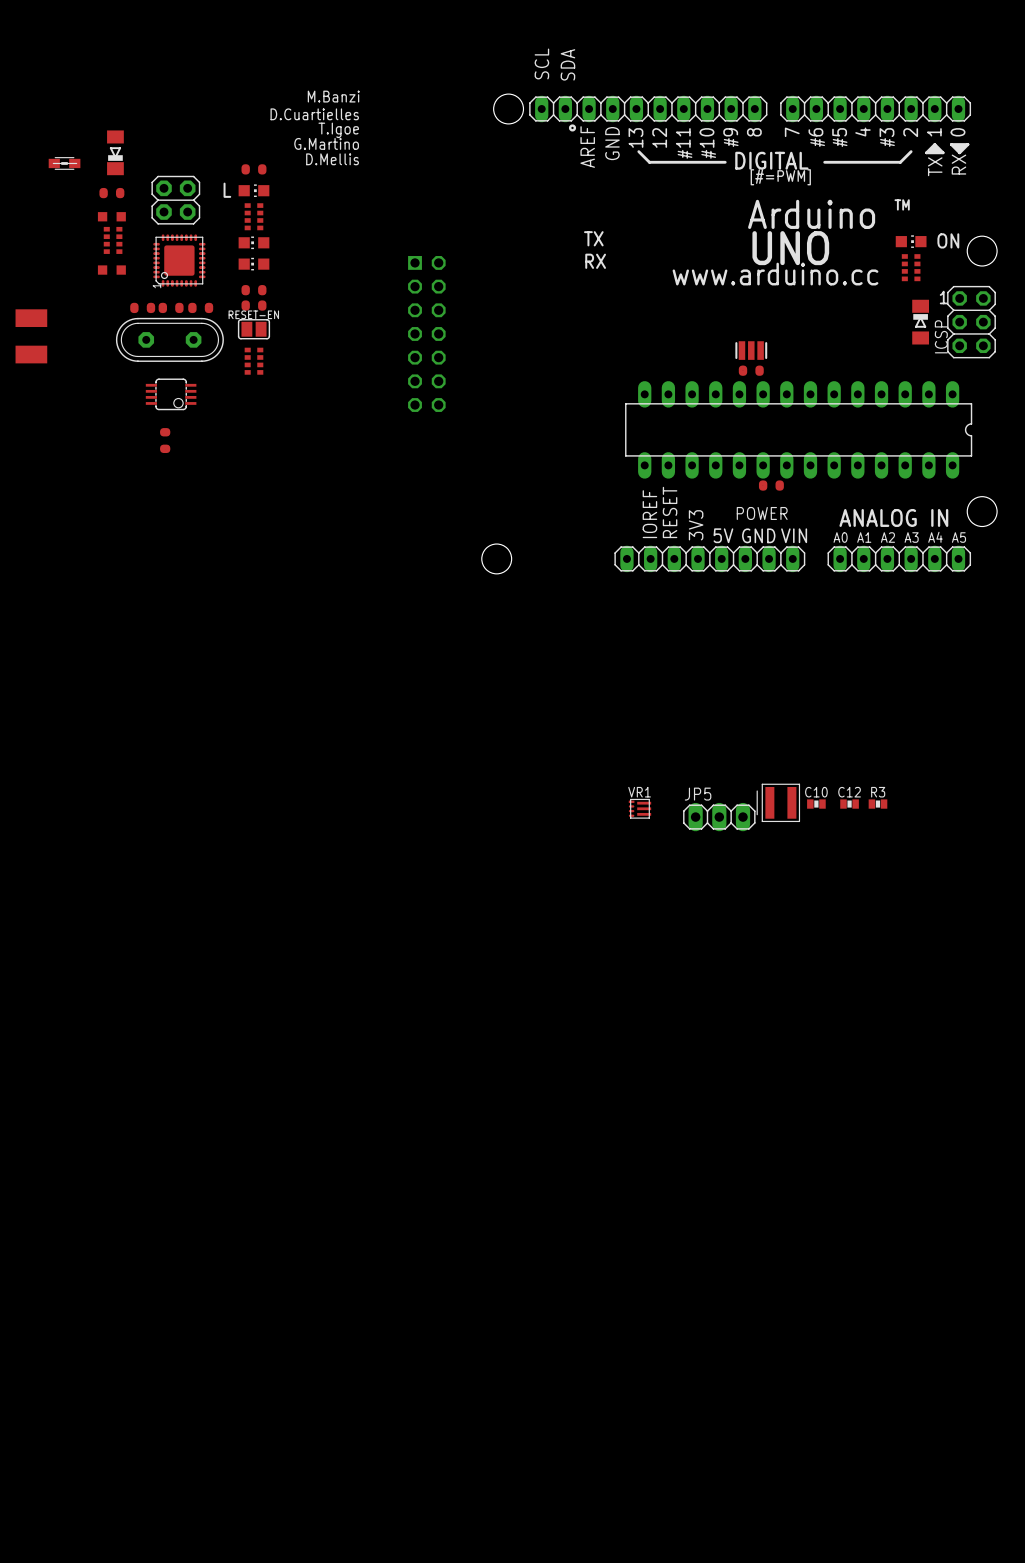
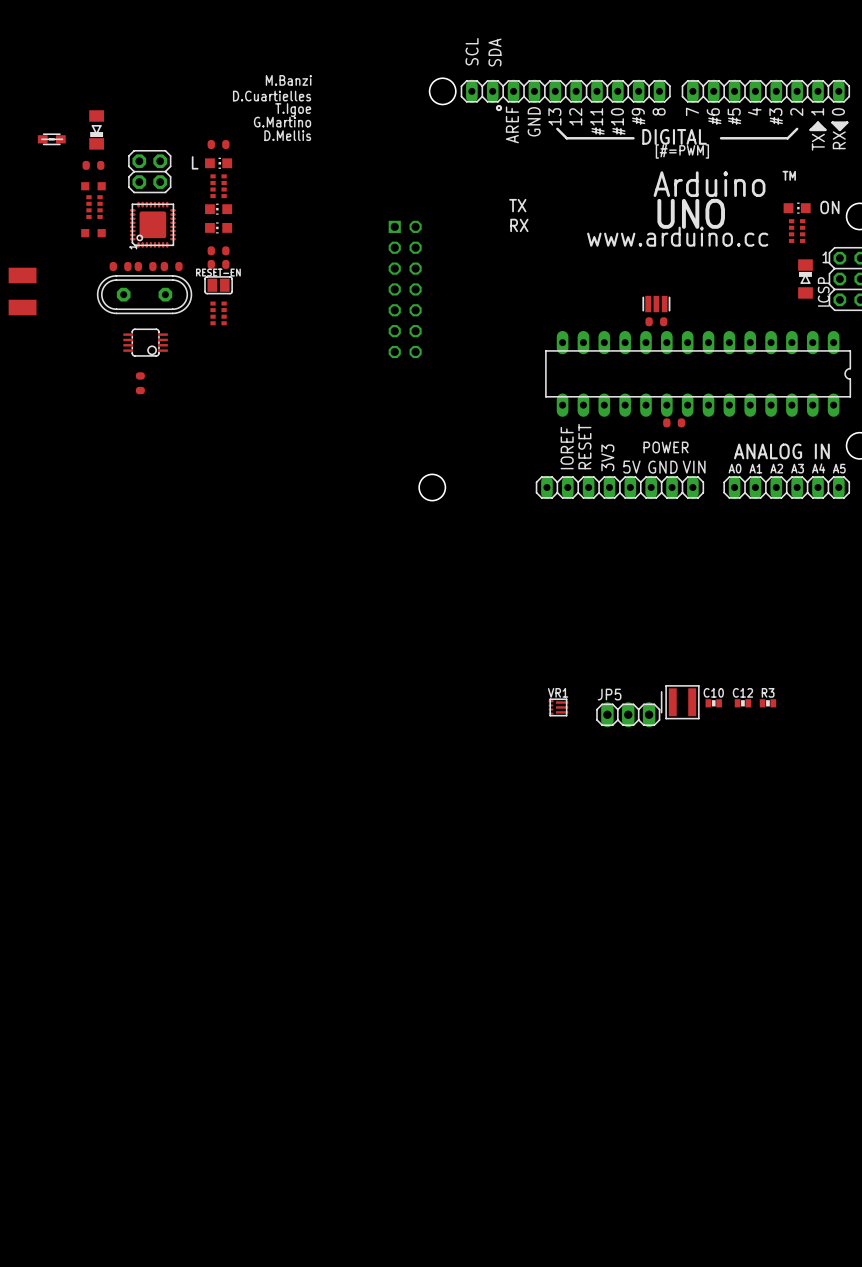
part position: (426, 333) -> (405, 289)

